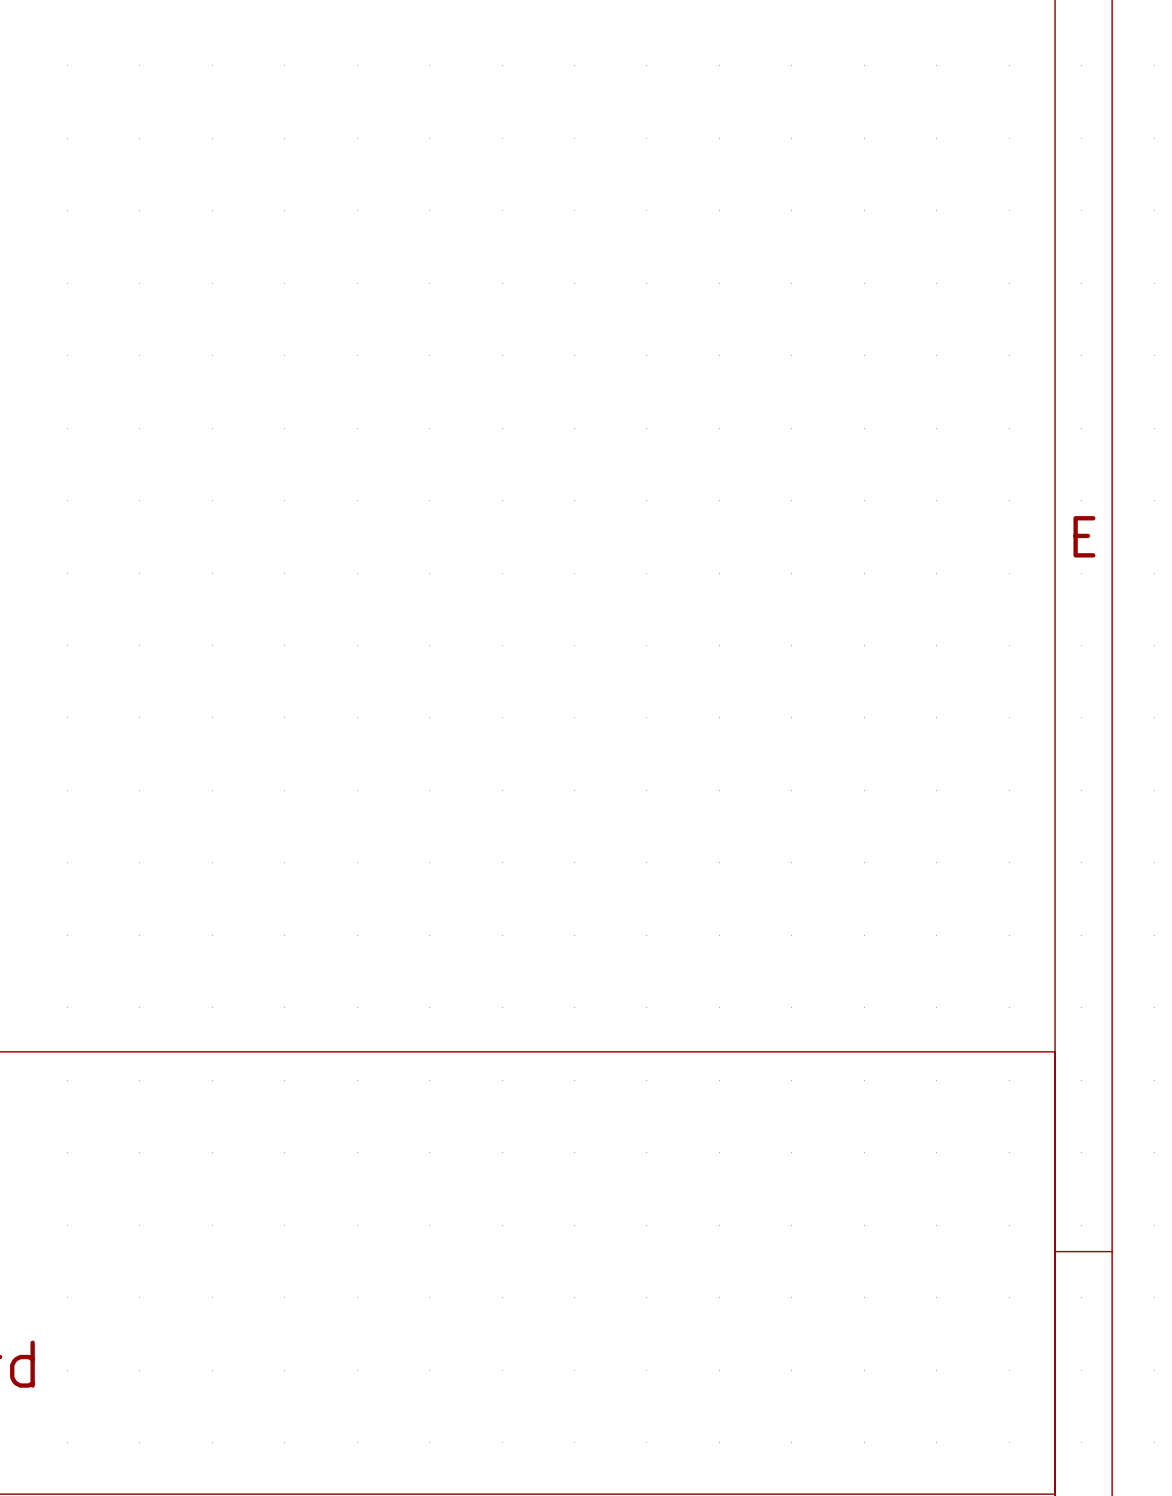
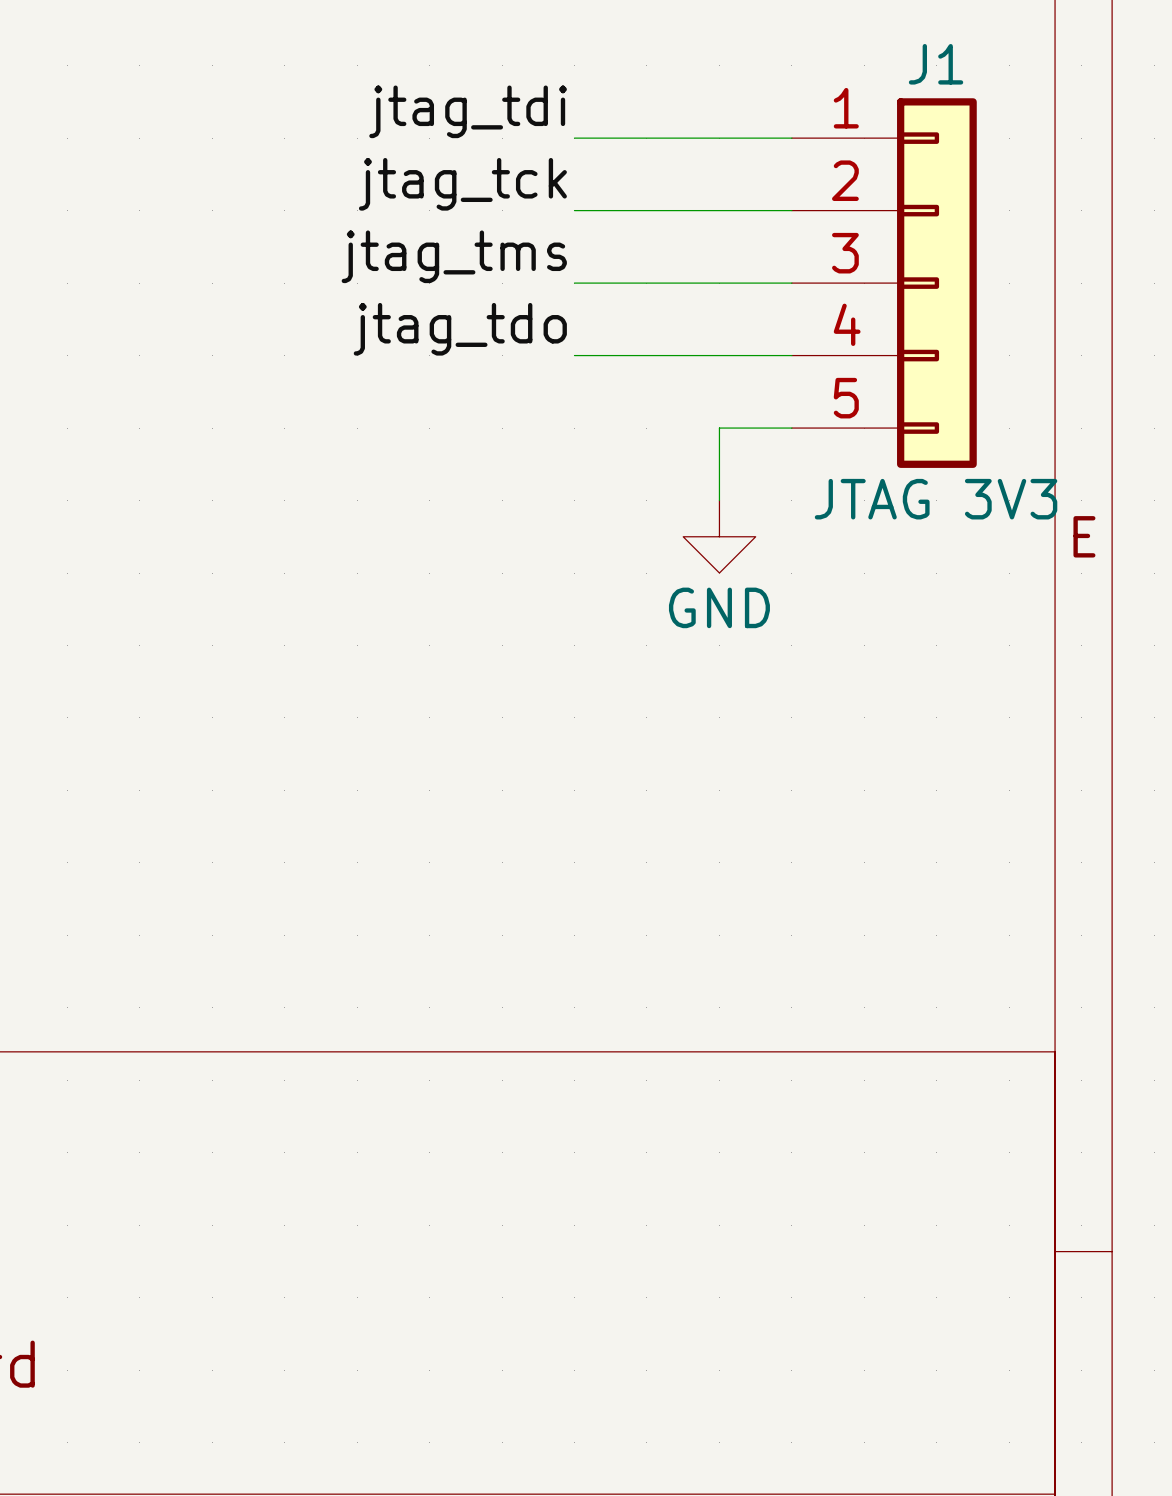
label: none -> jtag_tdi (468, 111)
wire: none -> (574, 138) (791, 138)
label: none -> jtag_tck (462, 184)
wire: none -> (574, 210) (791, 210)
label: none -> jtag_tms (454, 256)
wire: none -> (574, 283) (791, 283)
J1: none -> JTAG 3V3 (884, 283)
label: none -> jtag_tdo (460, 329)
wire: none -> (574, 355) (791, 355)
wire: none -> (791, 428) (719, 428) (719, 500)
power symbol: none -> GND (719, 536)

